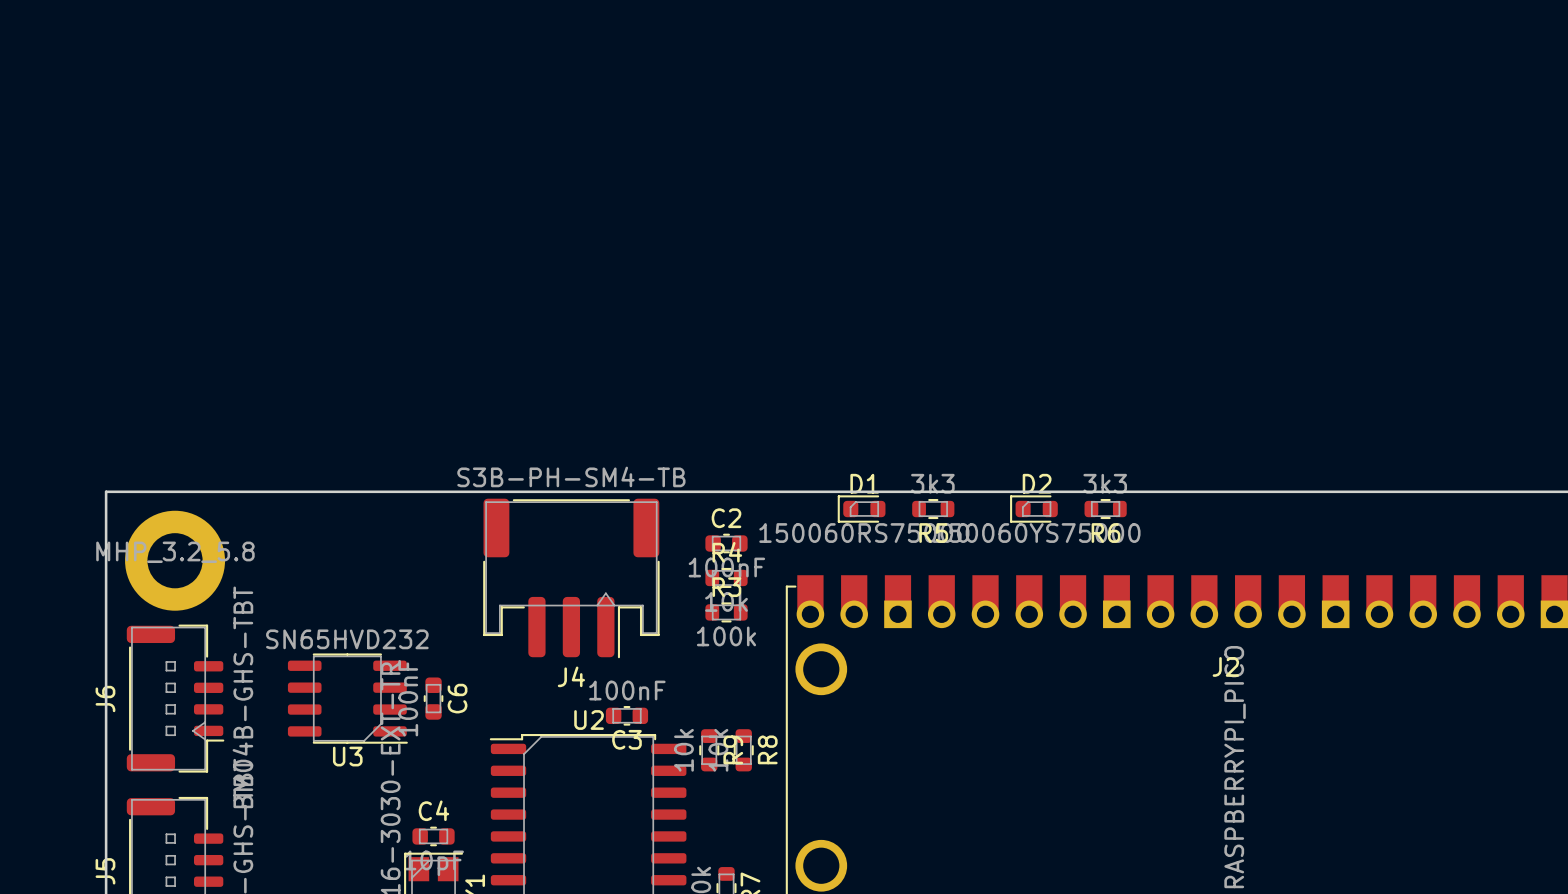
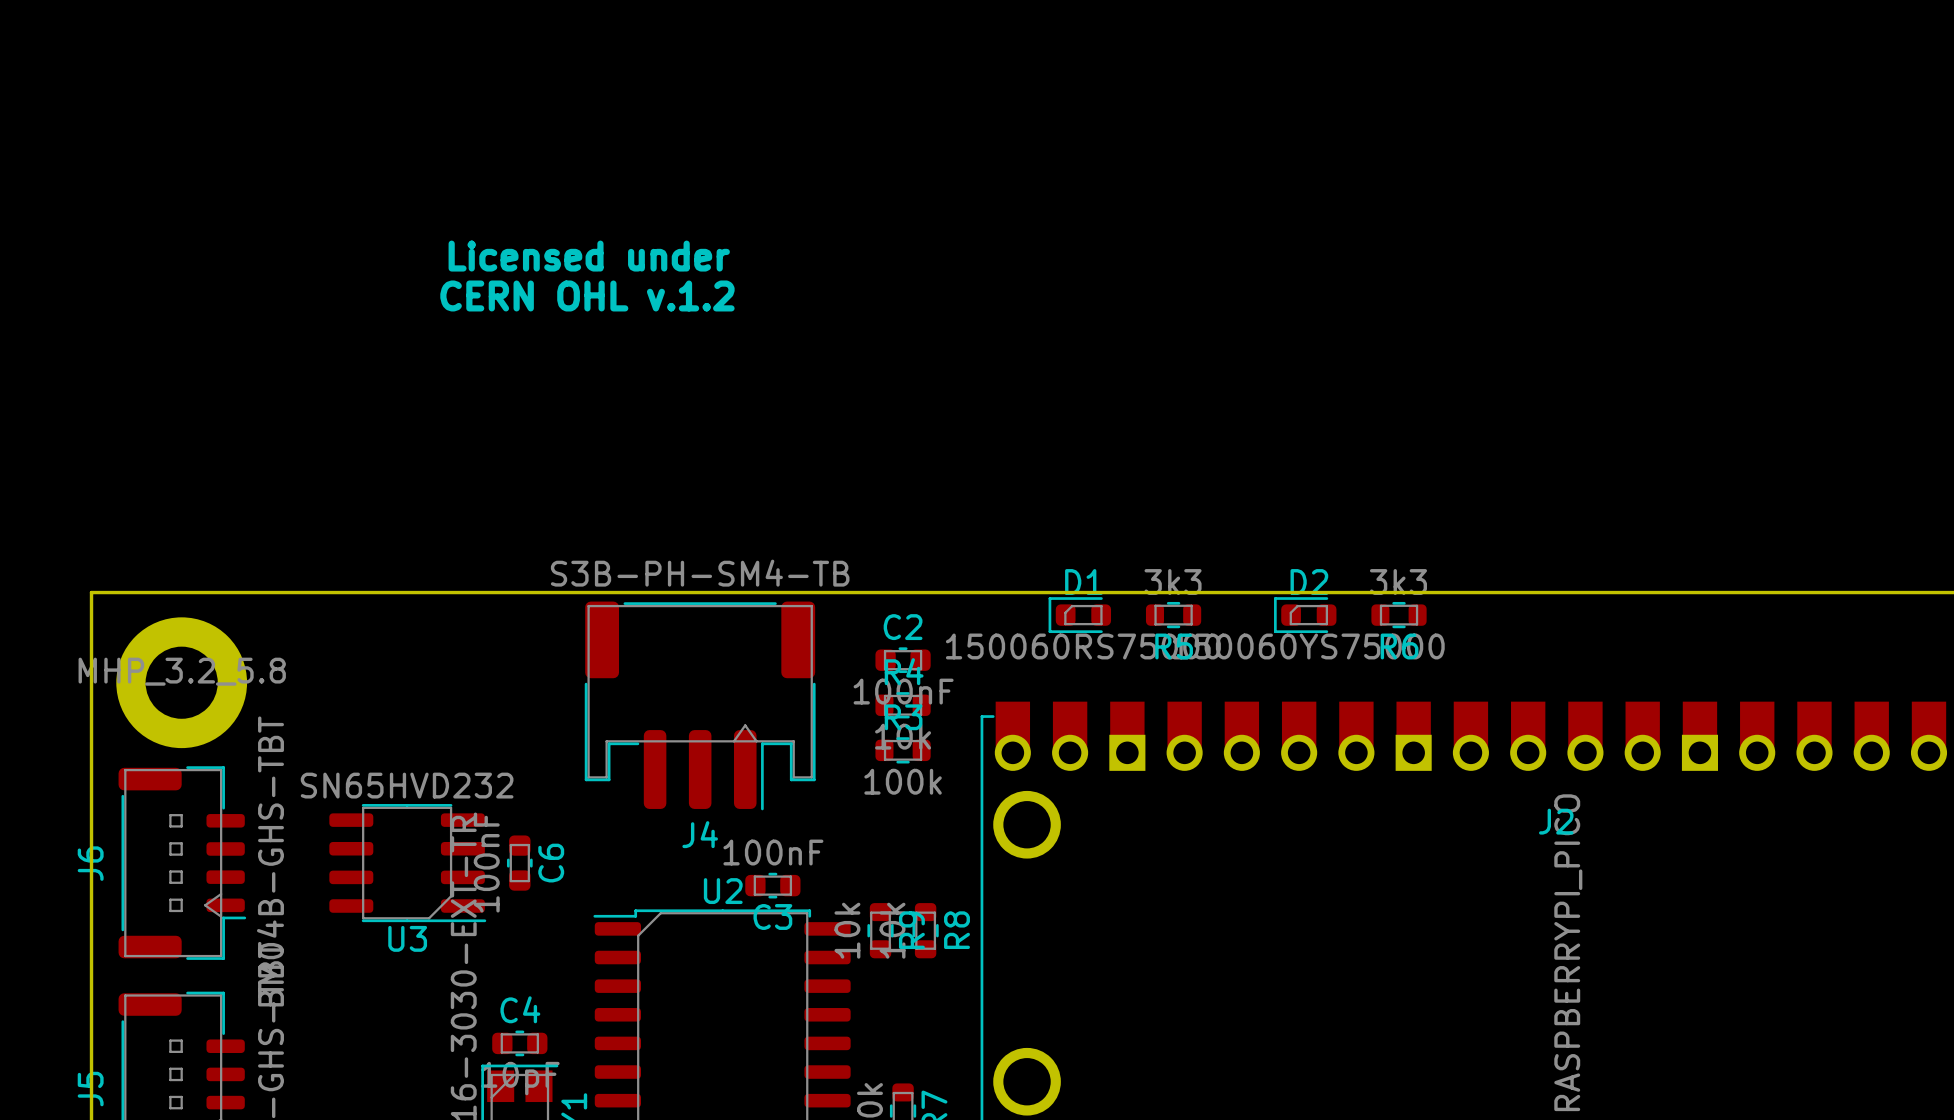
text: none -> Licensed under (589, 256)
text: none -> CERN OHL v.1.2 (587, 295)

